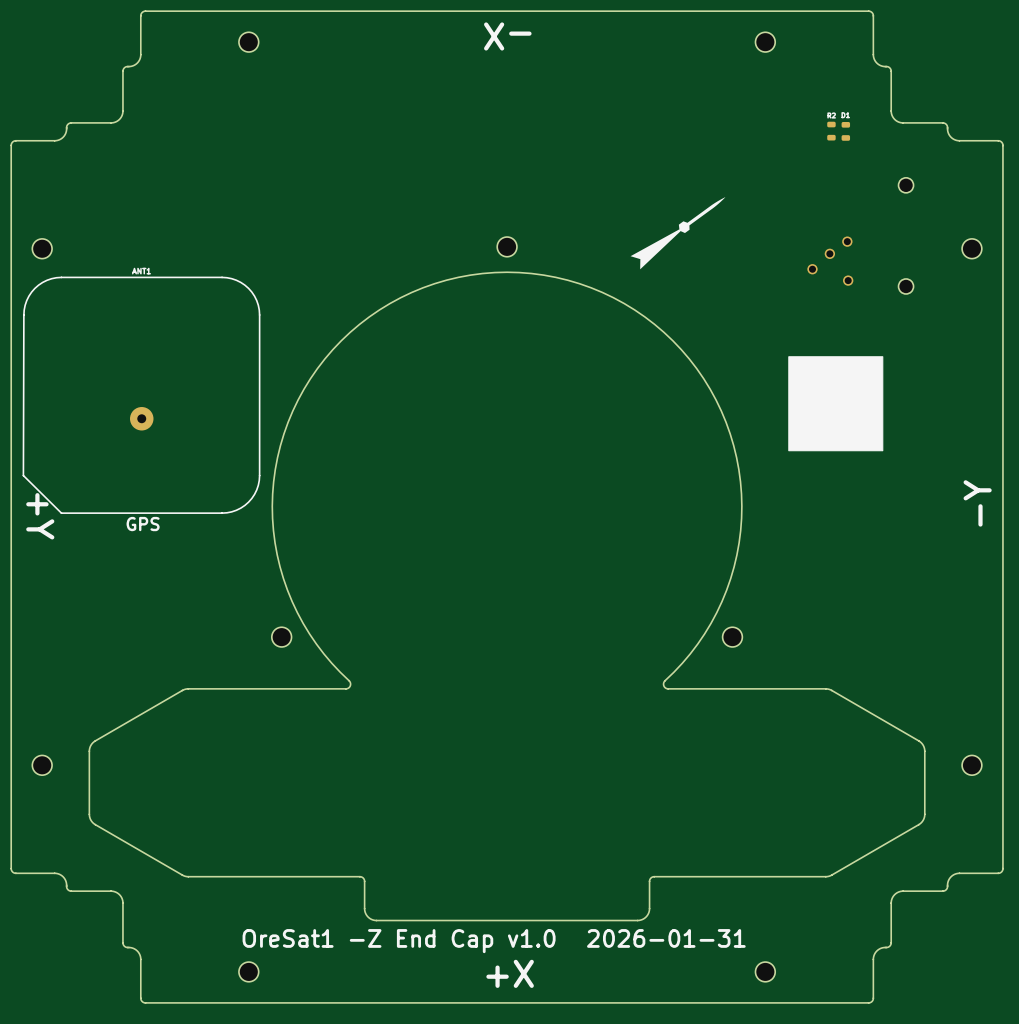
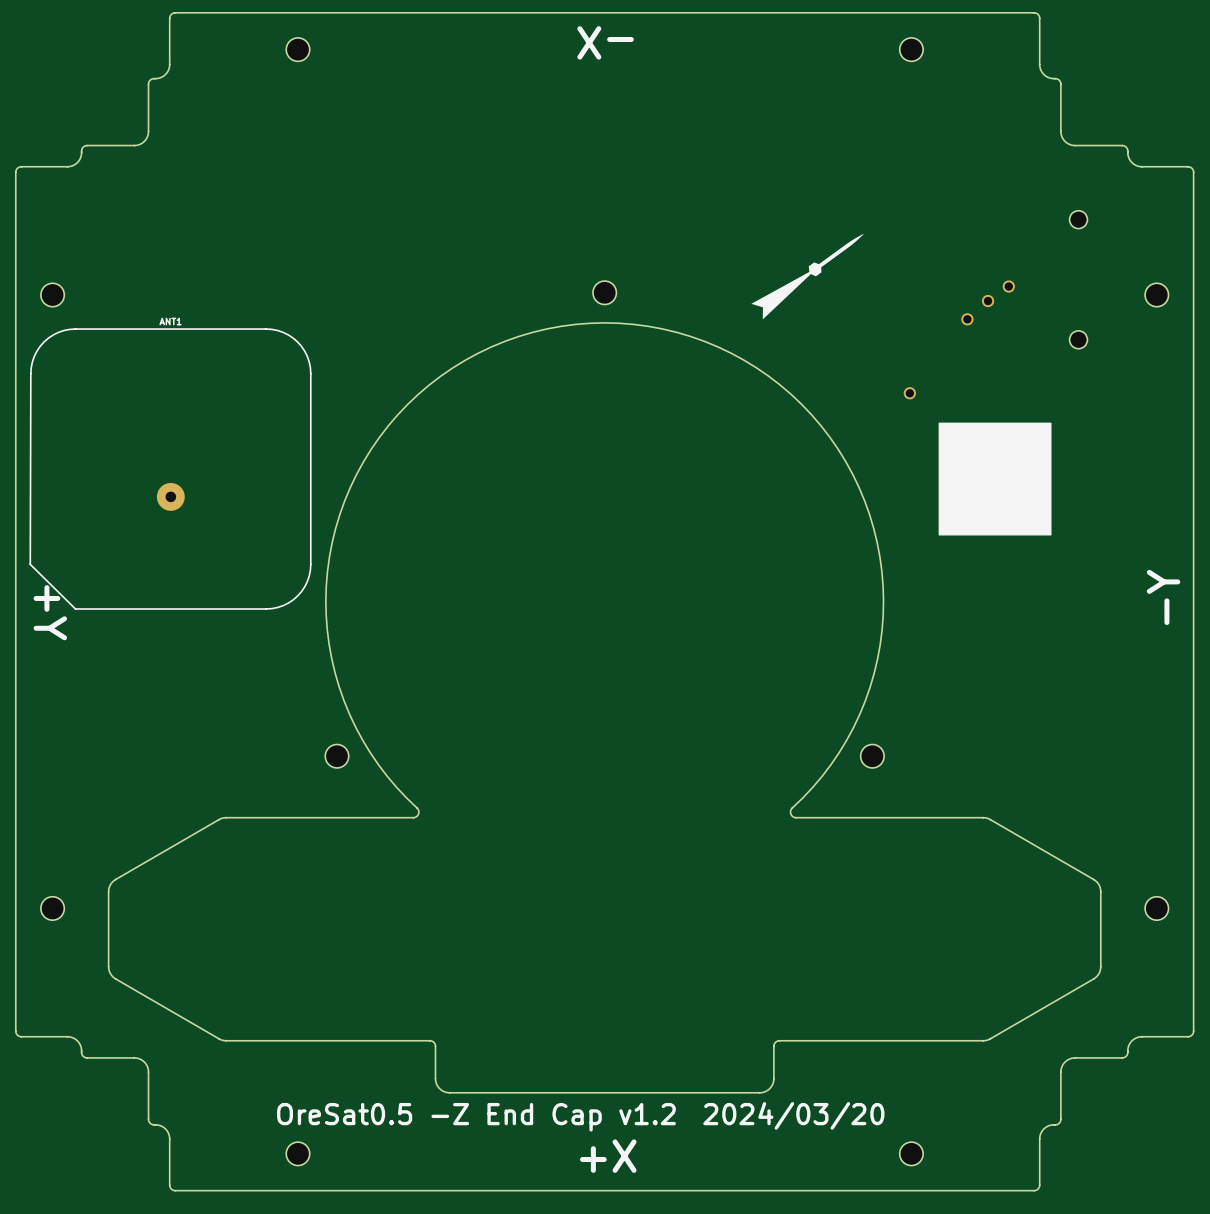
part: (831, 131) -> none
part: (845, 131) -> none
part position: (848, 280) -> (909, 393)
text: GPS (143, 524) -> none
text: 2026-01-31 (666, 938) -> 2024/03/20 (793, 1115)
text: OreSat1 -Z End Cap v1.0 (399, 941) -> OreSat0.5 -Z End Cap v1.2 (476, 1117)

